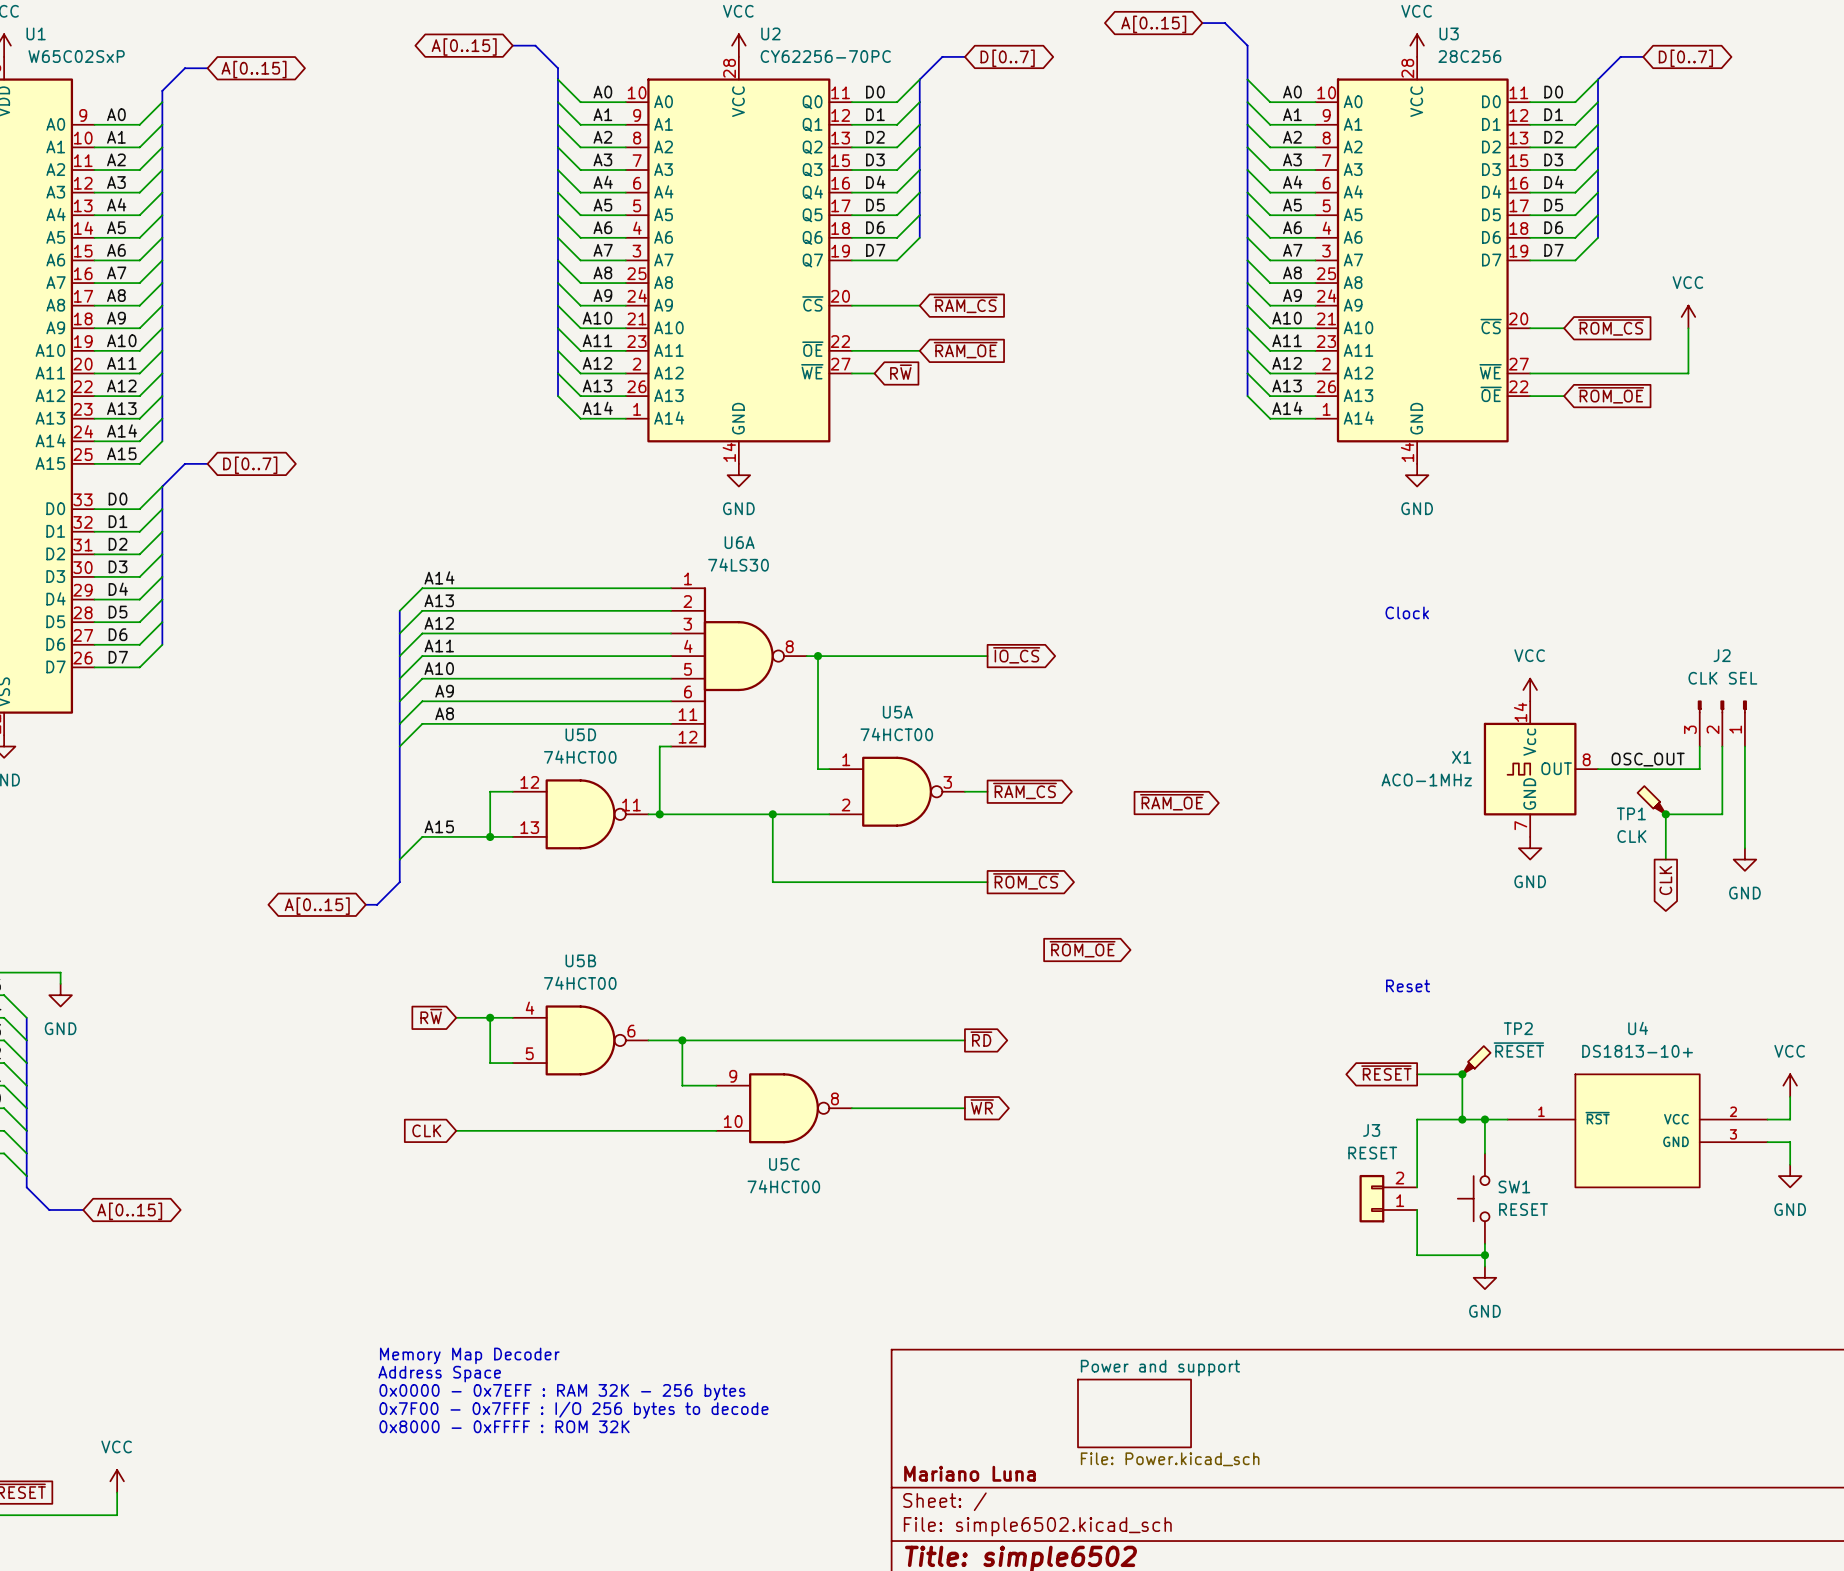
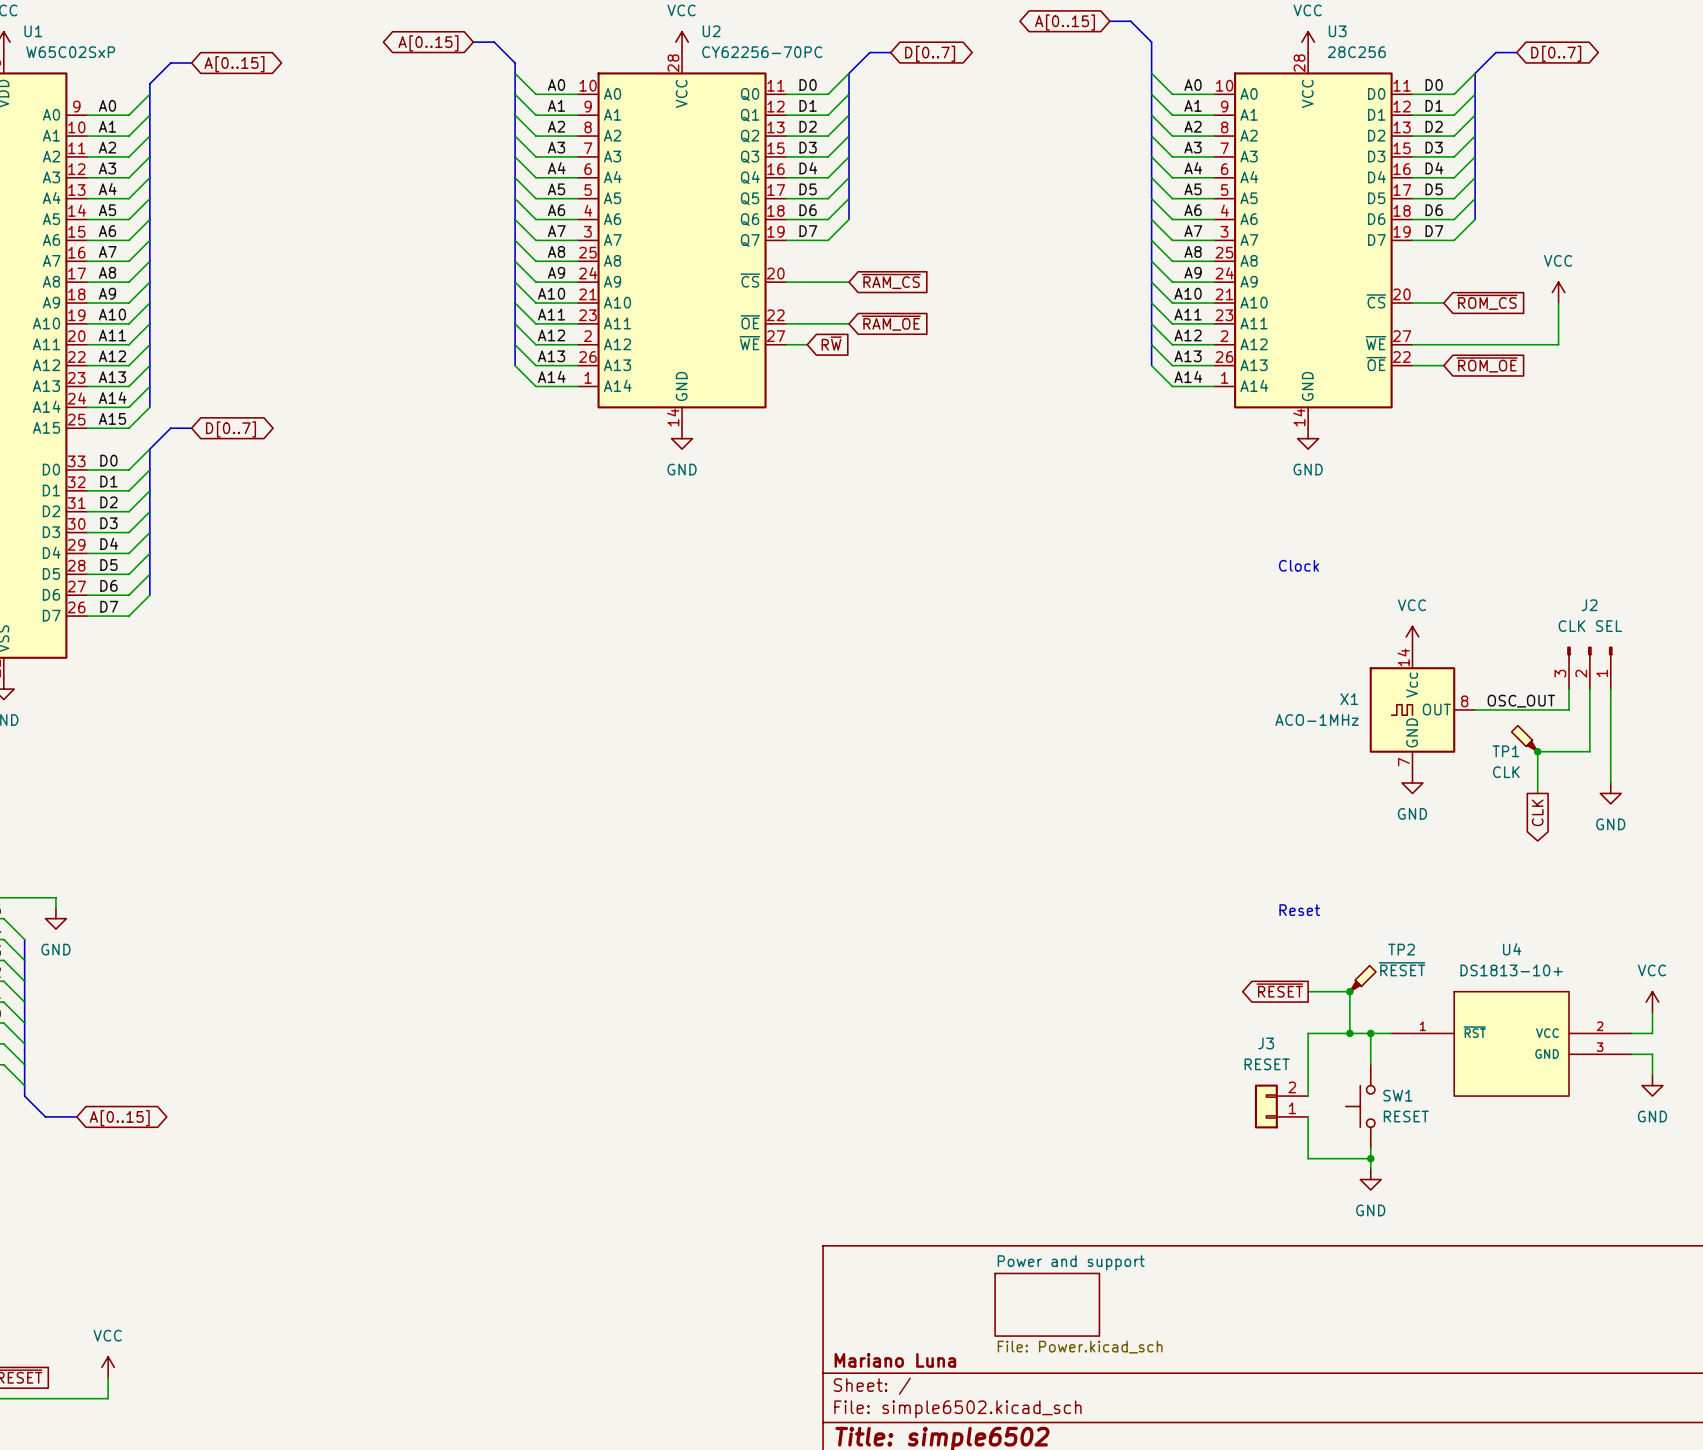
label: A14 (439, 577) -> none
wire: (671, 588) (422, 588) (399, 610) -> none
label: A13 (439, 600) -> none
bus: (399, 610) (399, 882) (377, 904) (365, 904) -> none
wire: (671, 610) (422, 610) (399, 633) -> none
label: A12 (439, 623) -> none
wire: (671, 633) (422, 633) (399, 656) -> none
label: A11 (439, 645) -> none
global label: ~{IO_CS} (1016, 655) -> none
wire: (671, 656) (422, 656) (399, 678) -> none
wire: (806, 656) (987, 656) -> none
wire: (818, 656) (818, 769) (829, 769) -> none
junction: (818, 656) -> none
U6A: 74LS30 (738, 667) -> none
label: A10 (439, 668) -> none
wire: (671, 678) (422, 678) (399, 701) -> none
label: A9 (444, 691) -> none
wire: (671, 701) (422, 701) (399, 723) -> none
label: A8 (444, 713) -> none
wire: (671, 723) (422, 723) (399, 746) -> none
wire: (671, 746) (659, 746) (659, 814) -> none
global label: ~{RAM_CS} (1024, 790) -> none
wire: (512, 791) (490, 791) (490, 836) -> none
U5A: 74HCT00 (897, 791) -> none
wire: (964, 791) (987, 791) -> none
global label: ~{RAM_OE} (1171, 802) -> none
U5D: 74HCT00 (580, 814) -> none
wire: (648, 814) (829, 814) -> none
junction: (659, 814) -> none
wire: (772, 814) (772, 882) (987, 882) -> none
junction: (772, 814) -> none
label: A15 (439, 826) -> none
junction: (490, 836) -> none
wire: (512, 836) (422, 836) (399, 859) -> none
global label: ~{ROM_CS} (1026, 881) -> none
global label: A[0..15] (317, 906) -> none
global label: ~{ROM_OE} (1082, 949) -> none
global label: R~{W} (431, 1016) -> none
wire: (456, 1017) (512, 1017) -> none
wire: (490, 1017) (490, 1063) (512, 1063) -> none
junction: (490, 1017) -> none
global label: ~{RD} (981, 1039) -> none
U5B: 74HCT00 (580, 1040) -> none
wire: (648, 1040) (964, 1040) -> none
wire: (682, 1040) (682, 1085) (716, 1085) -> none
junction: (682, 1040) -> none
global label: ~{WR} (982, 1106) -> none
U5C: 74HCT00 (784, 1108) -> none
wire: (851, 1108) (964, 1108) -> none
global label: CLK (426, 1130) -> none
wire: (456, 1130) (716, 1130) -> none
text: Memory Map Decoder (469, 1355) -> none
text: Address Space (439, 1374) -> none
text: 0x0000 - 0x7EFF : RAM 32K - 256 bytes (562, 1392) -> none
text: 0x7F00 - 0x7FFF : I/O 256 bytes to decode (573, 1410) -> none
text: 0x8000 - 0xFFFF : ROM 32K (504, 1426) -> none

